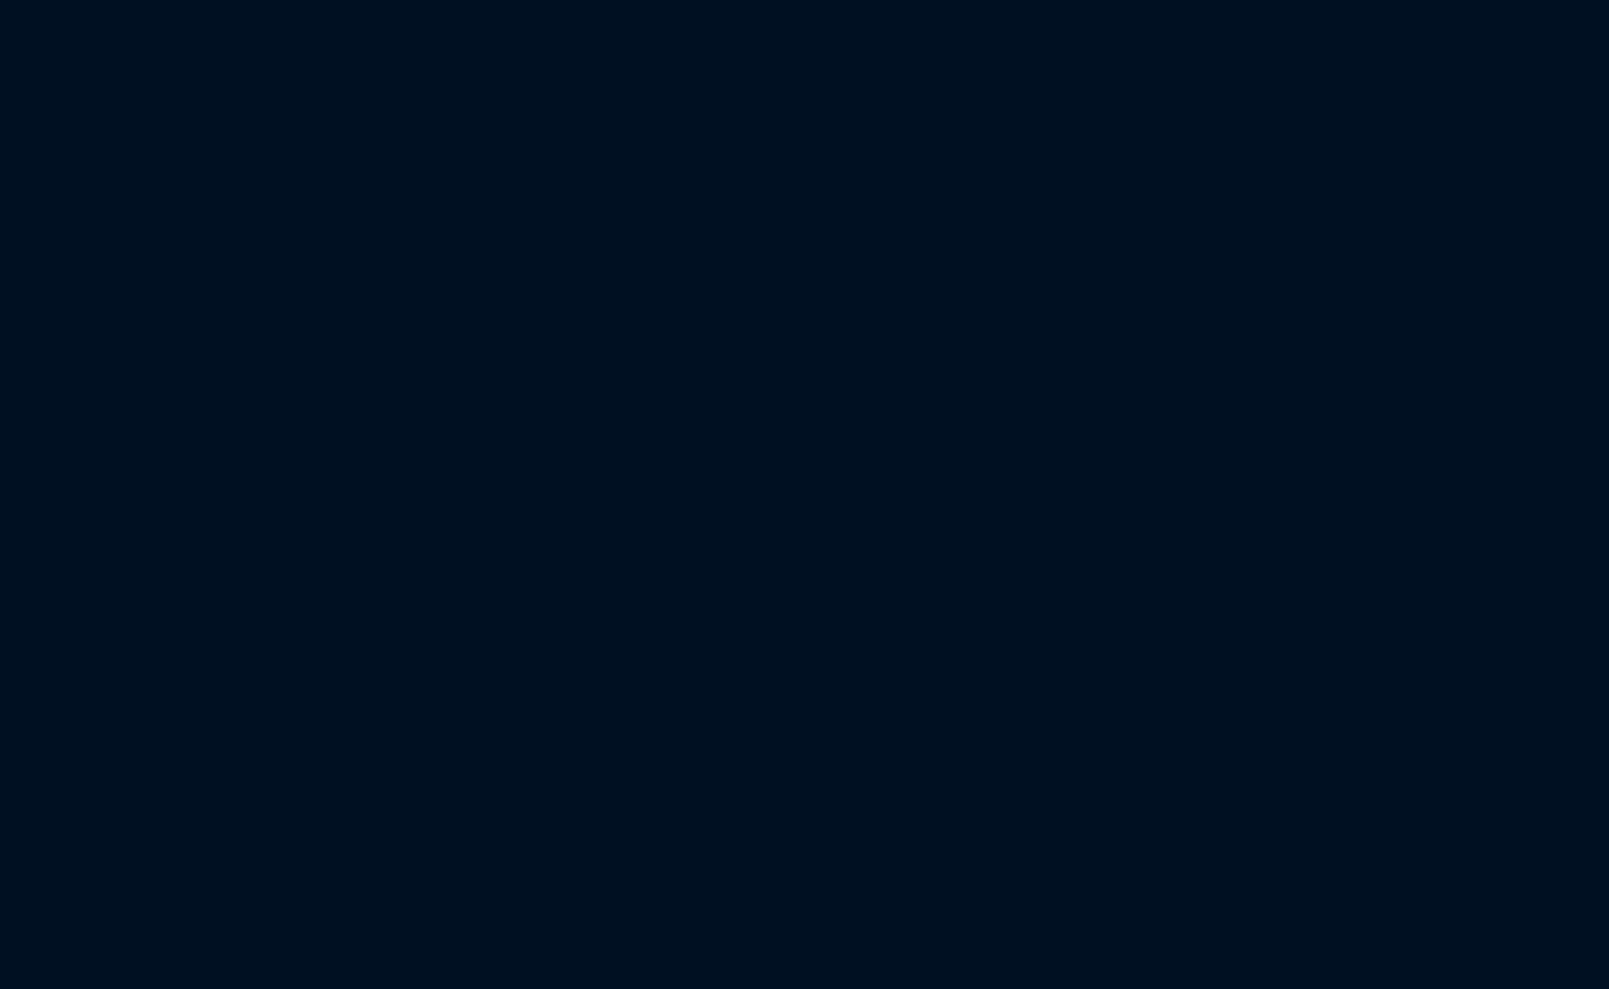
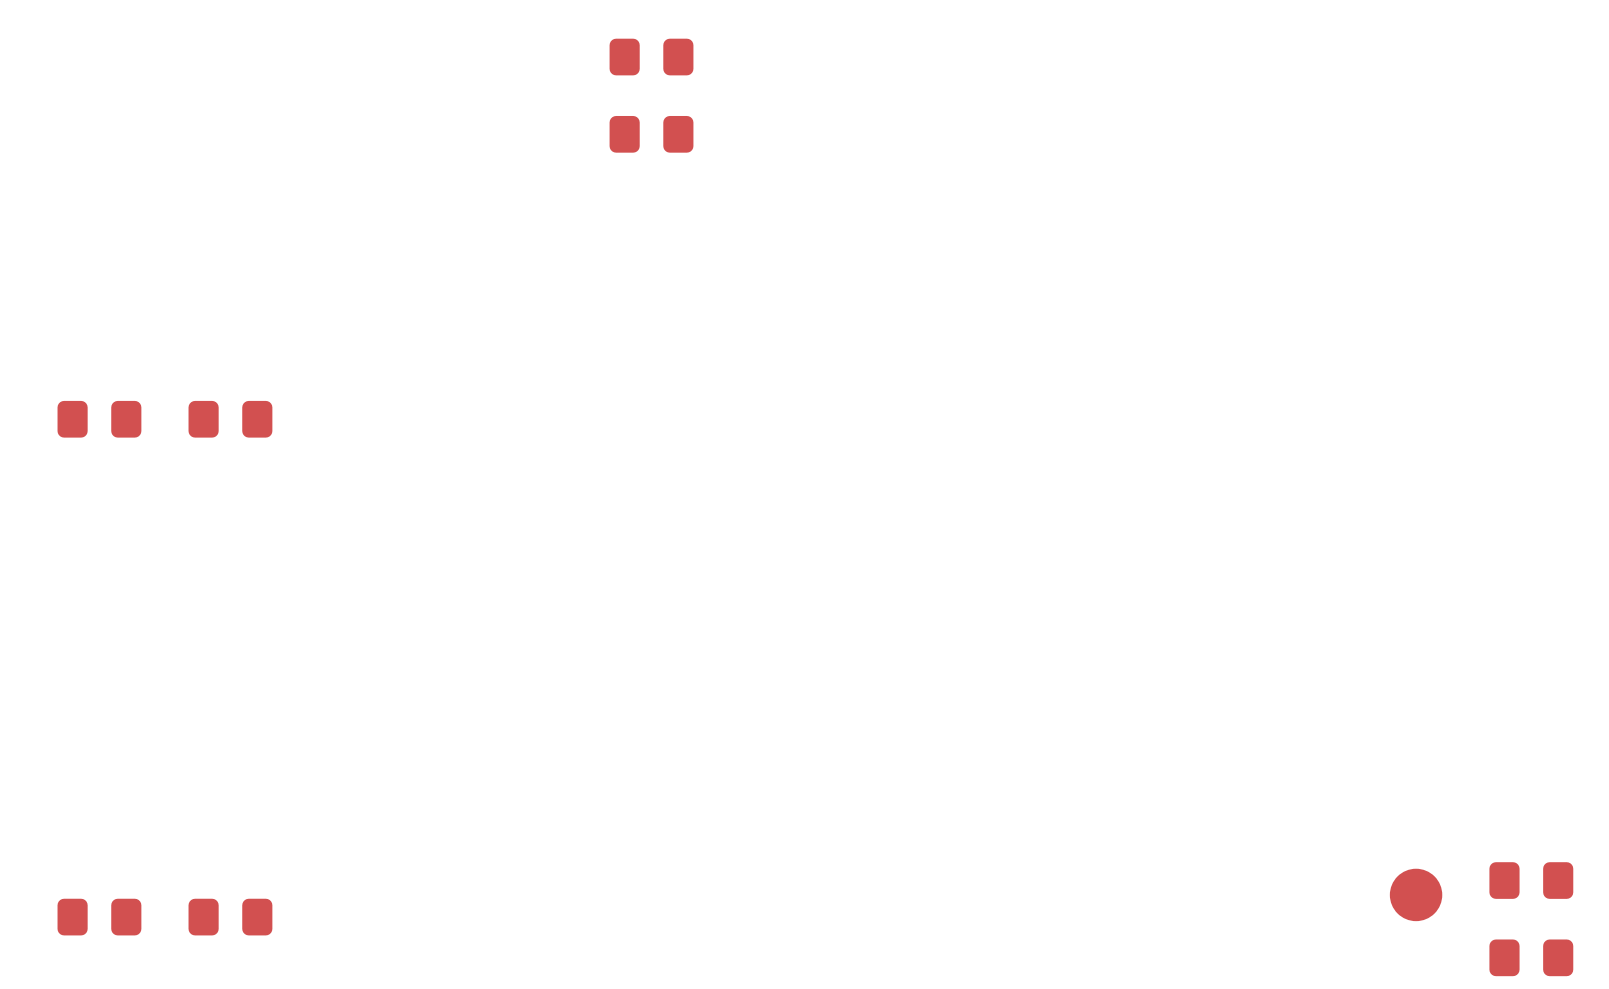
part: none -> (651, 57)
part: none -> (651, 134)
part: none -> (99, 419)
part: none -> (230, 419)
part: none -> (1531, 880)
part: none -> (1416, 894)
part: none -> (99, 917)
part: none -> (230, 917)
part: none -> (1531, 957)

